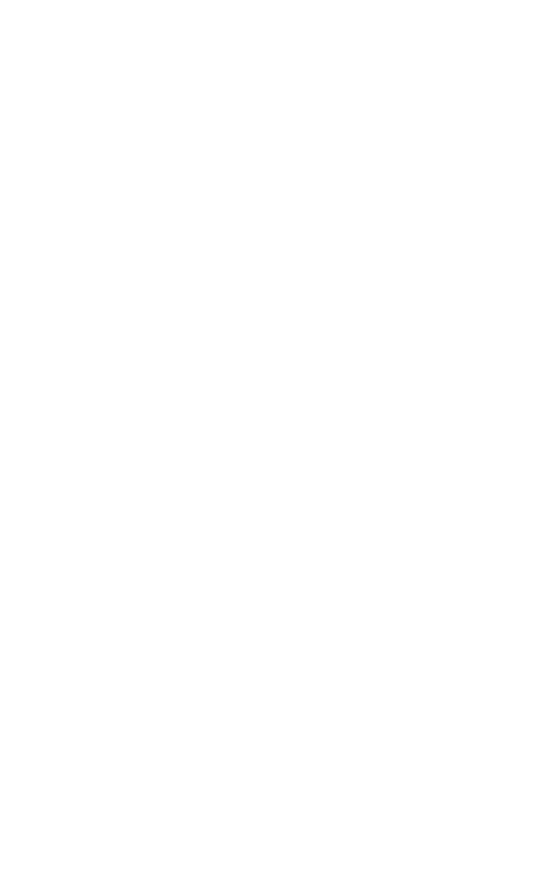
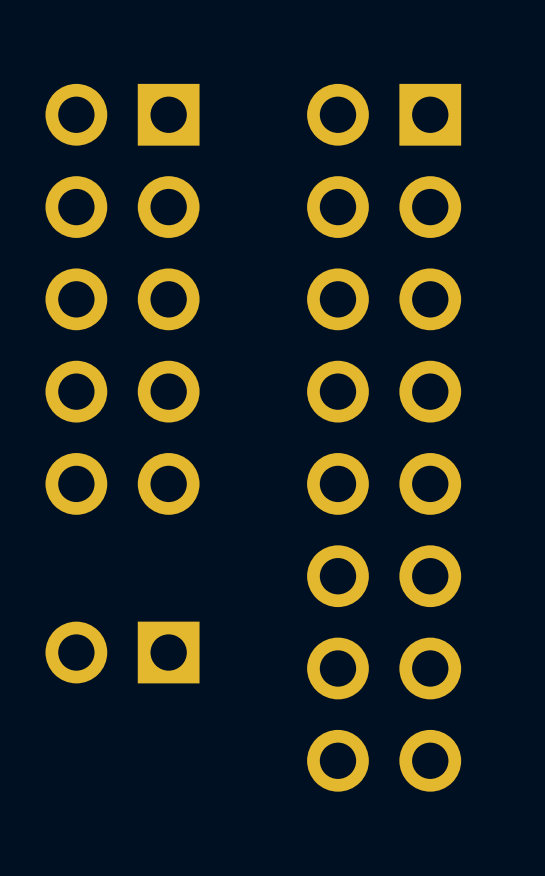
part: none -> (122, 299)
part: none -> (384, 437)
part: none -> (122, 652)

